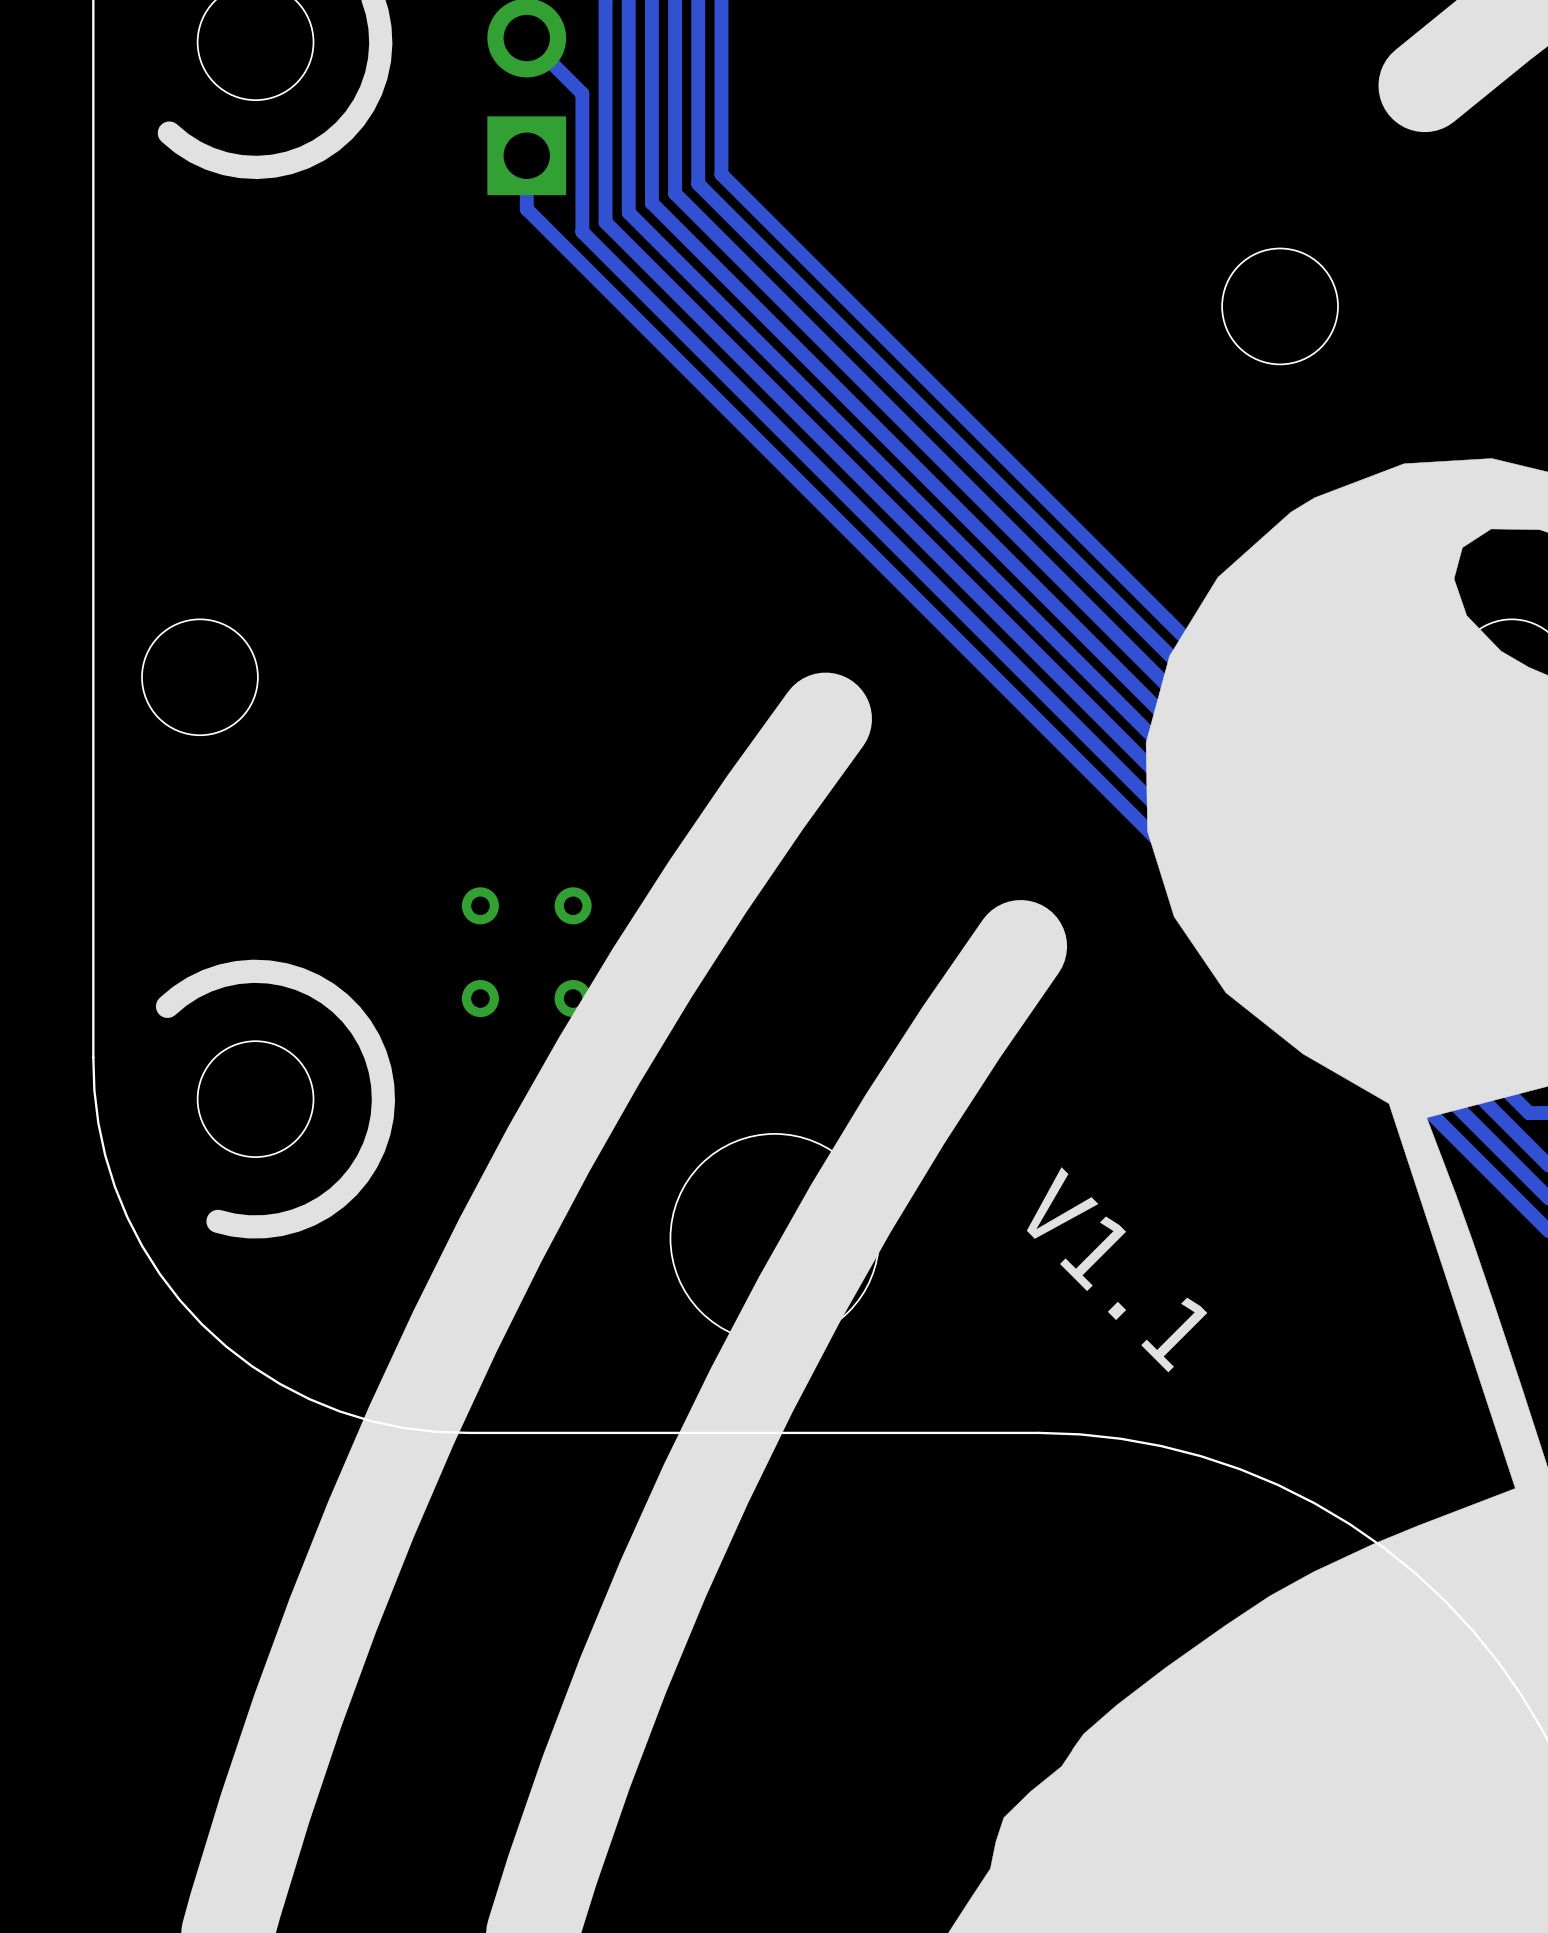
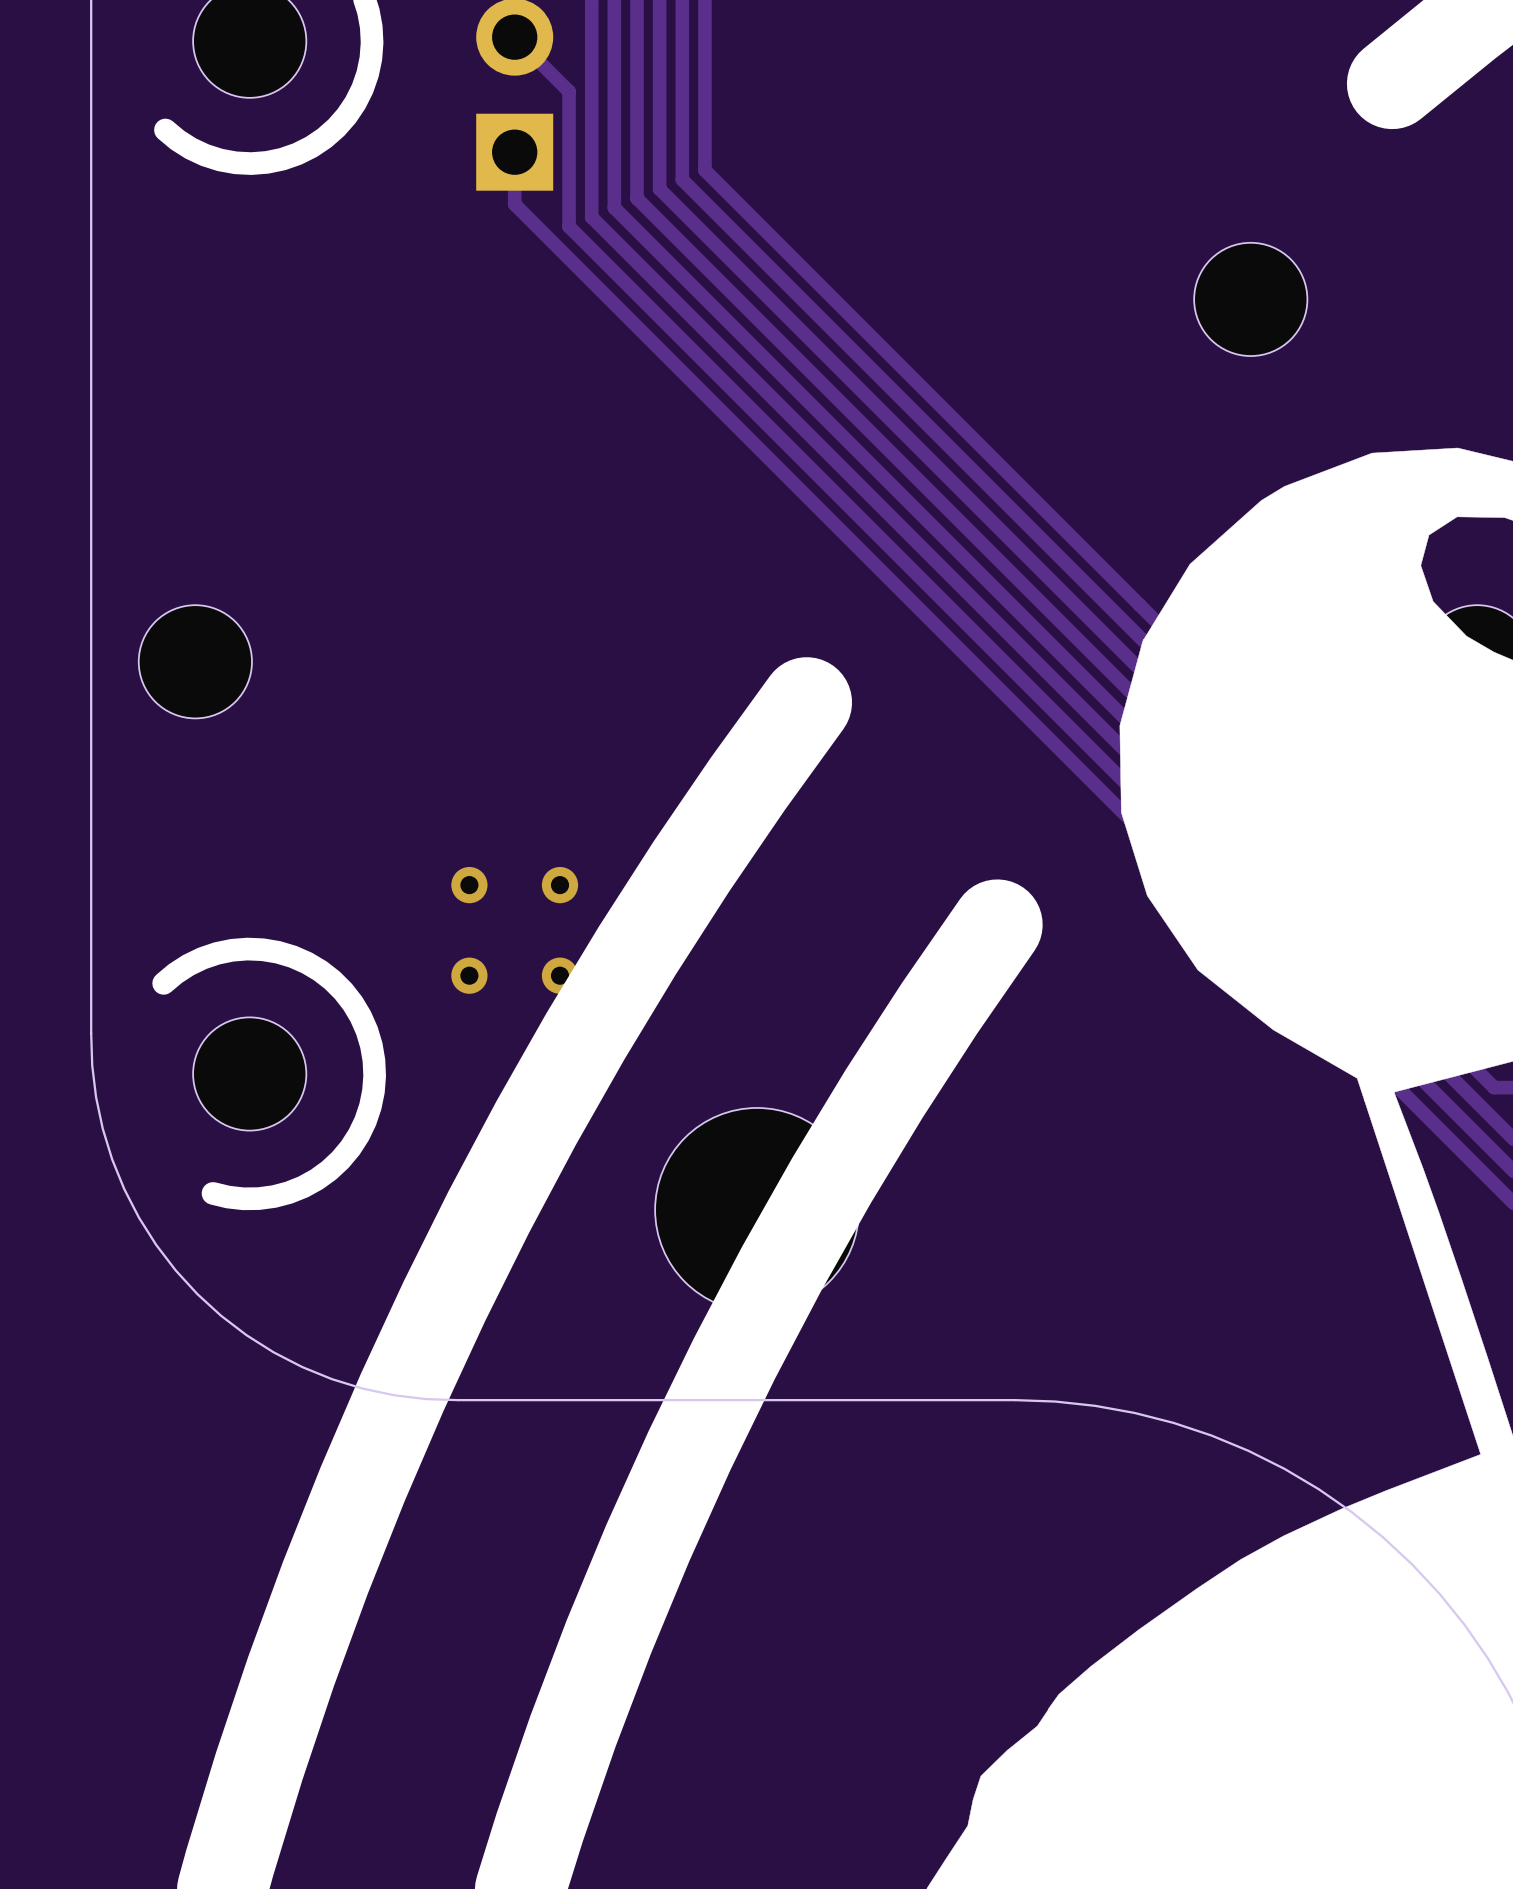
text: V1.1 (1117, 1269) -> none

